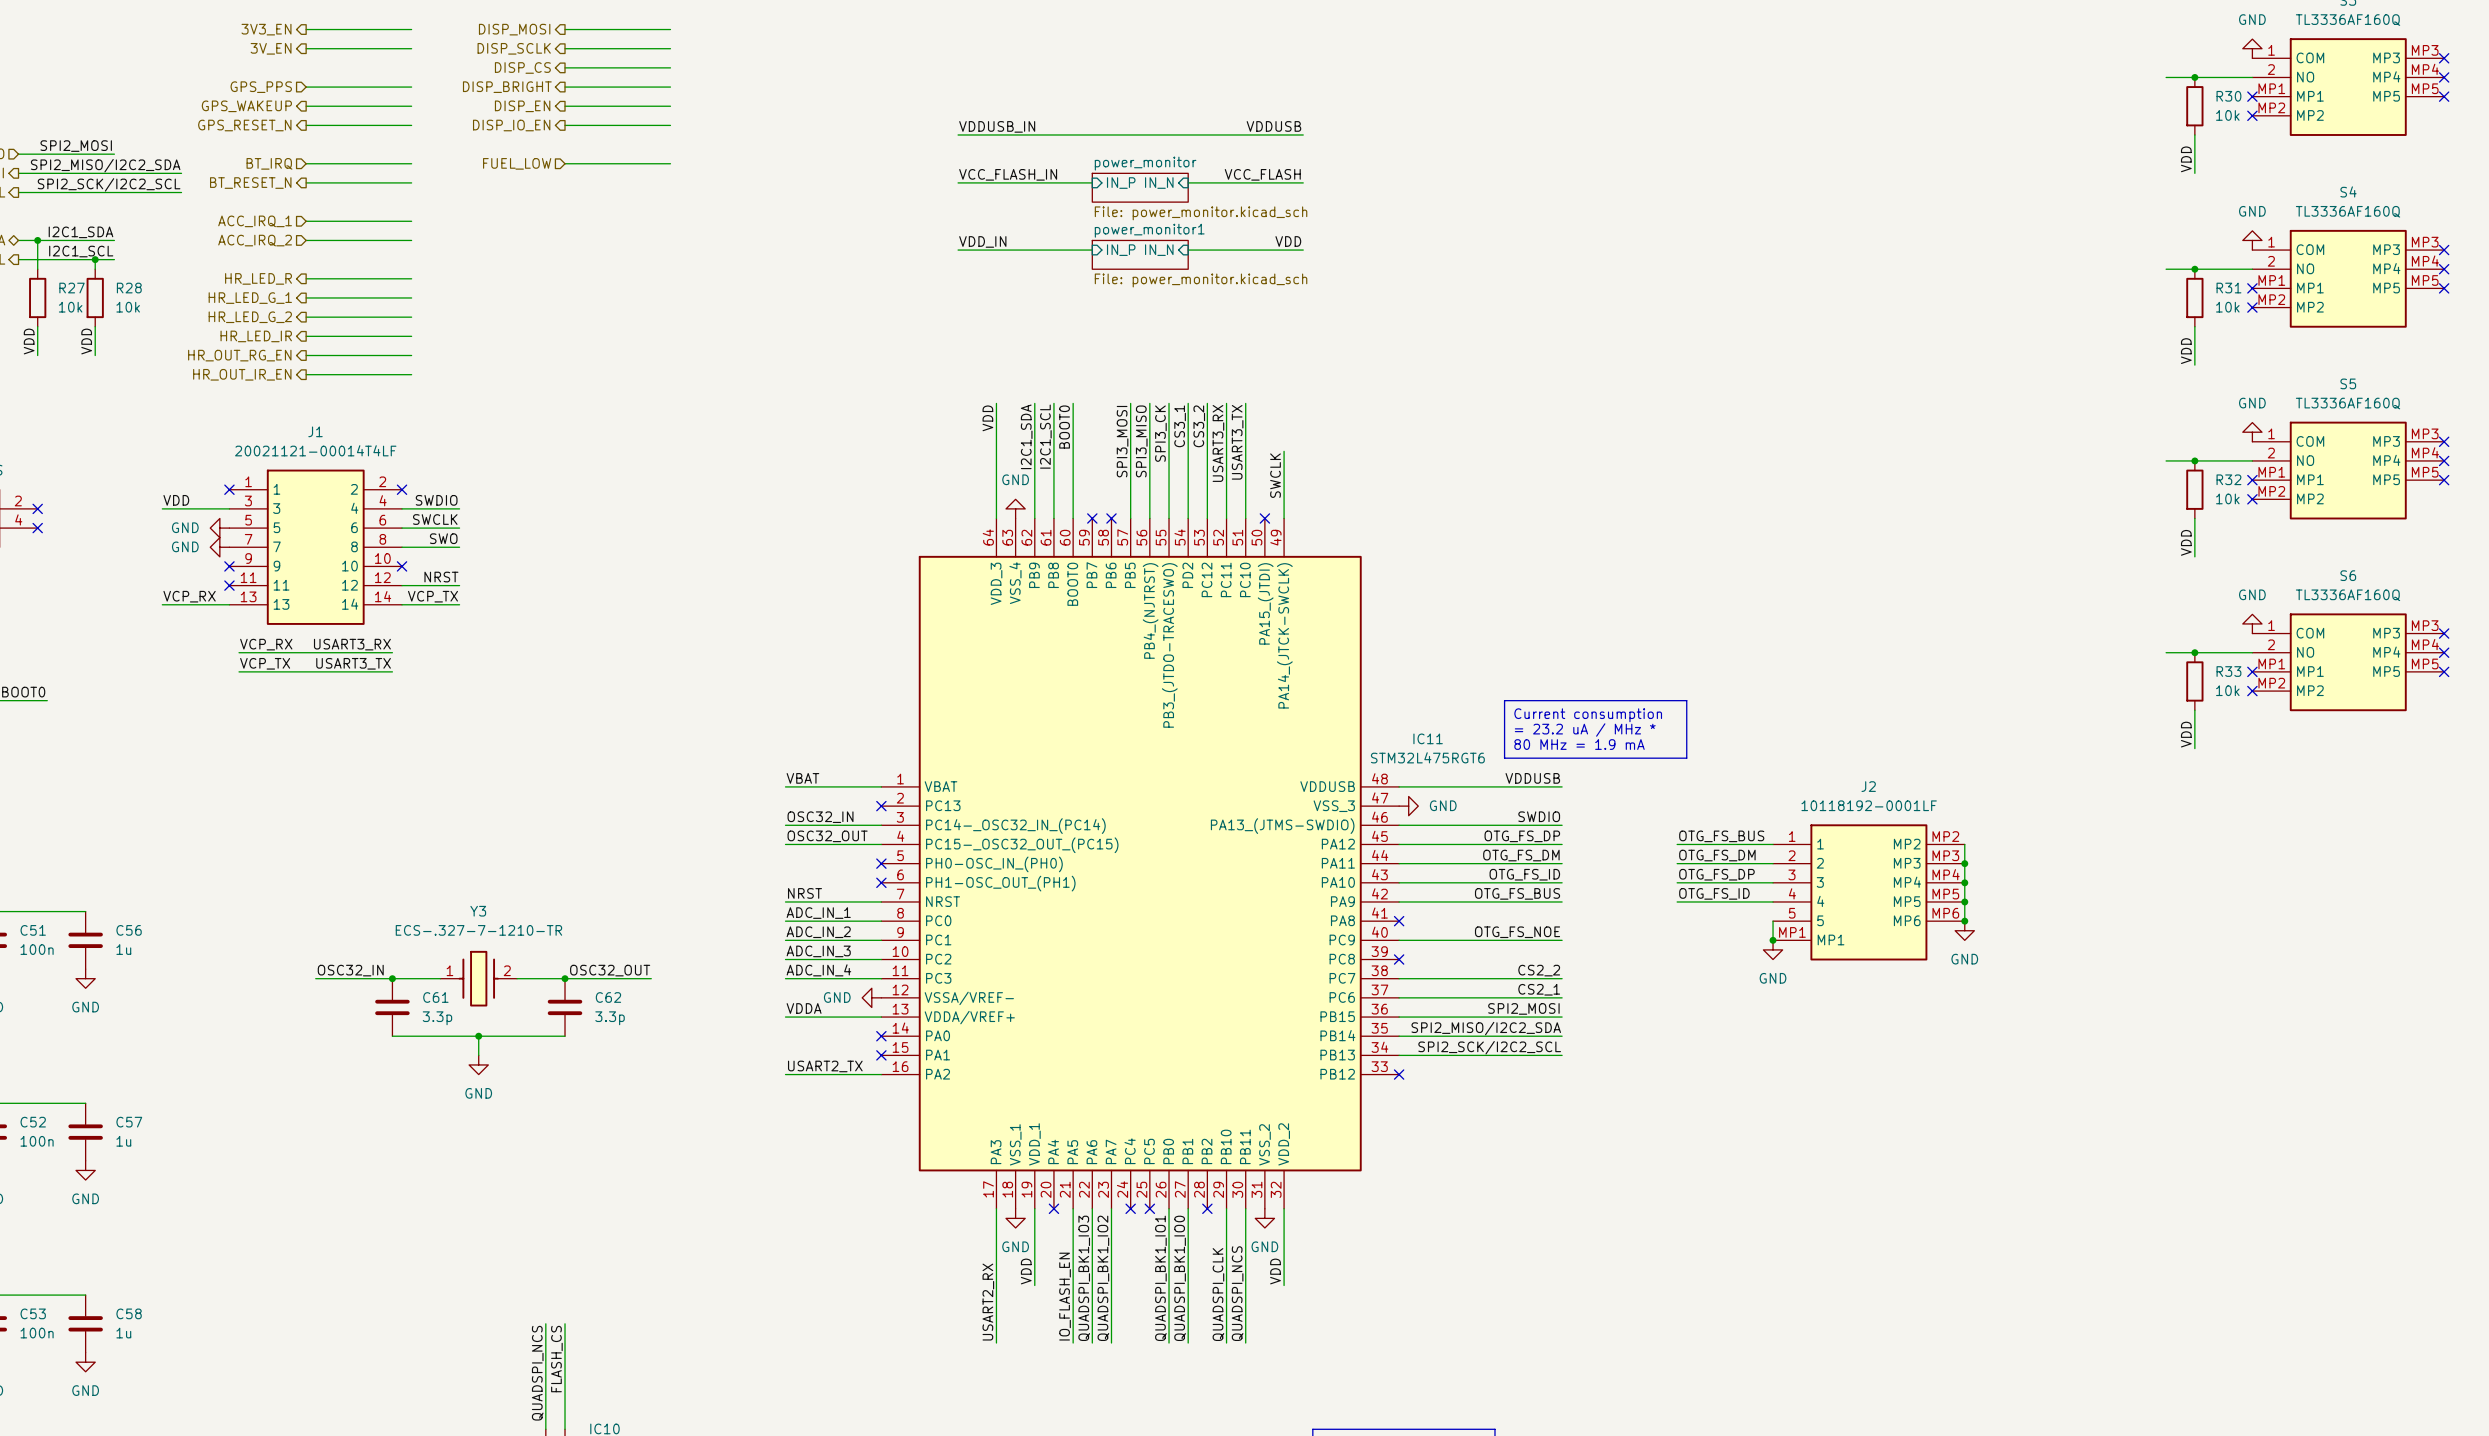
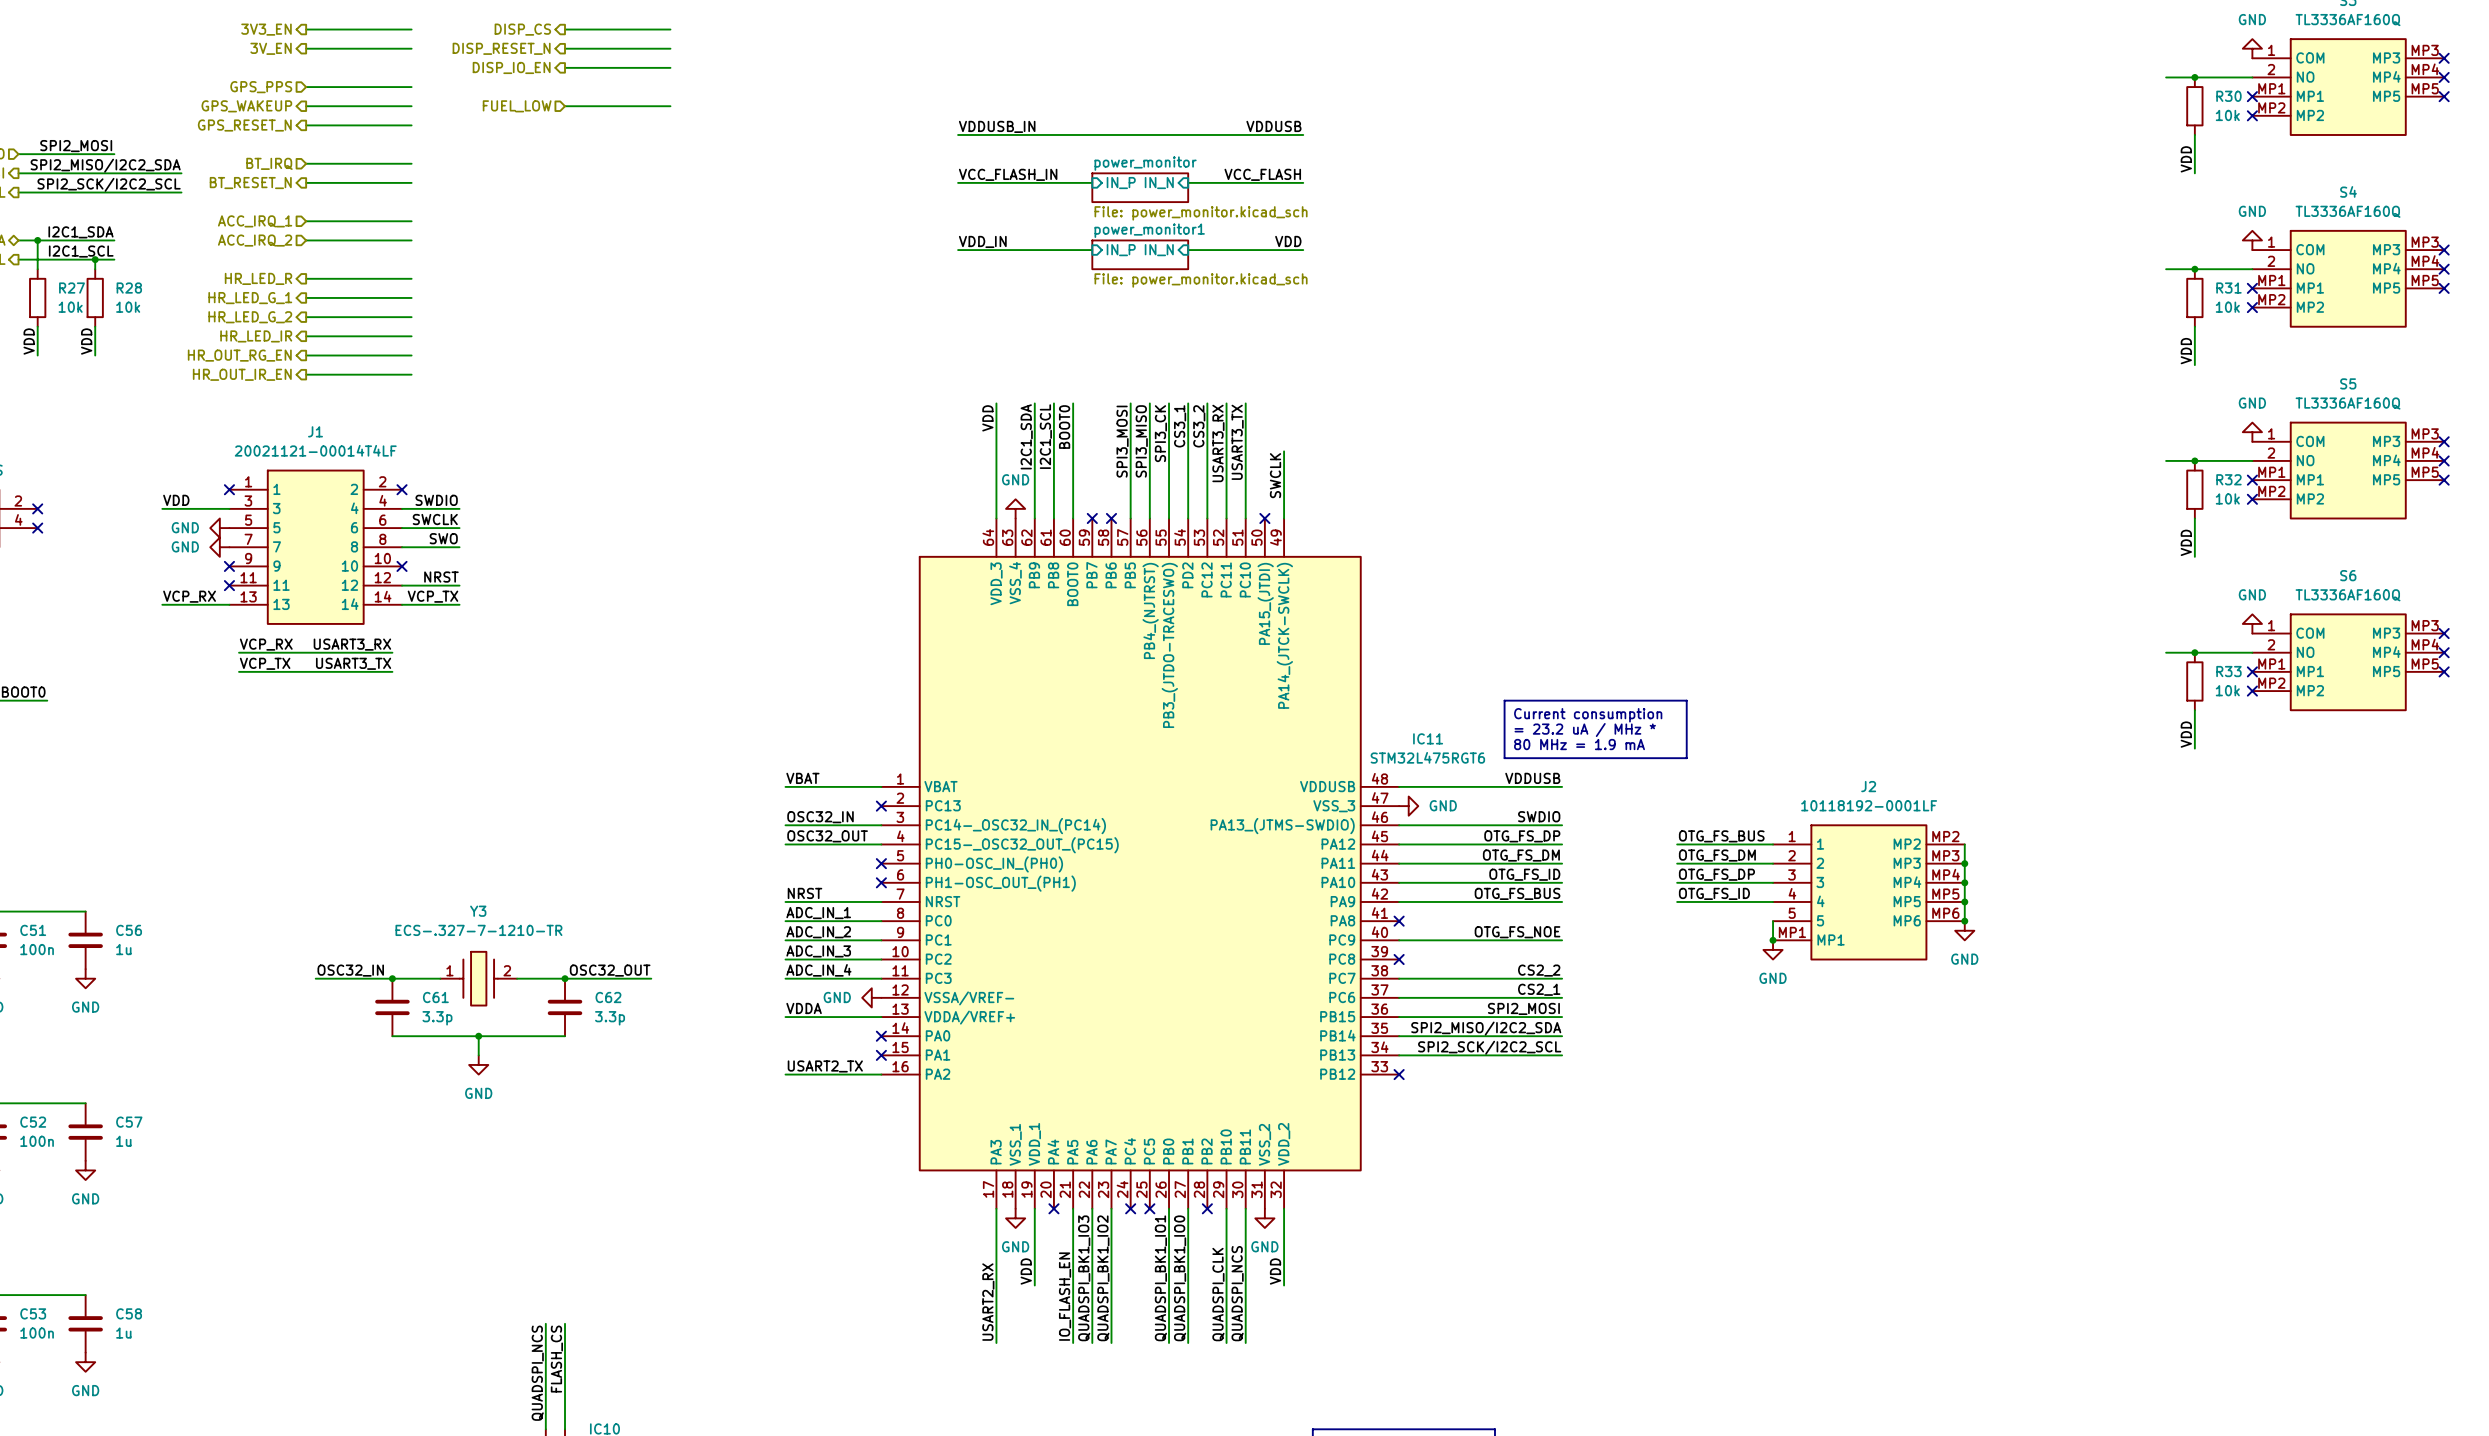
hierarchical label: DISP_MOSI (514, 29) -> DISP_CS (522, 29)
hierarchical label: DISP_SCLK (514, 48) -> DISP_RESET_N (501, 48)
hierarchical label: DISP_CS (522, 67) -> DISP_IO_EN (511, 67)
hierarchical label: DISP_BRIGHT (507, 87) -> none
wire: (565, 87) (670, 87) -> none
hierarchical label shape: output (522, 106) -> input (517, 106)
hierarchical label: DISP_EN (522, 106) -> FUEL_LOW (517, 106)
hierarchical label: DISP_IO_EN (511, 125) -> none
wire: (565, 125) (670, 125) -> none
hierarchical label: FUEL_LOW (517, 163) -> none
wire: (565, 163) (670, 163) -> none

